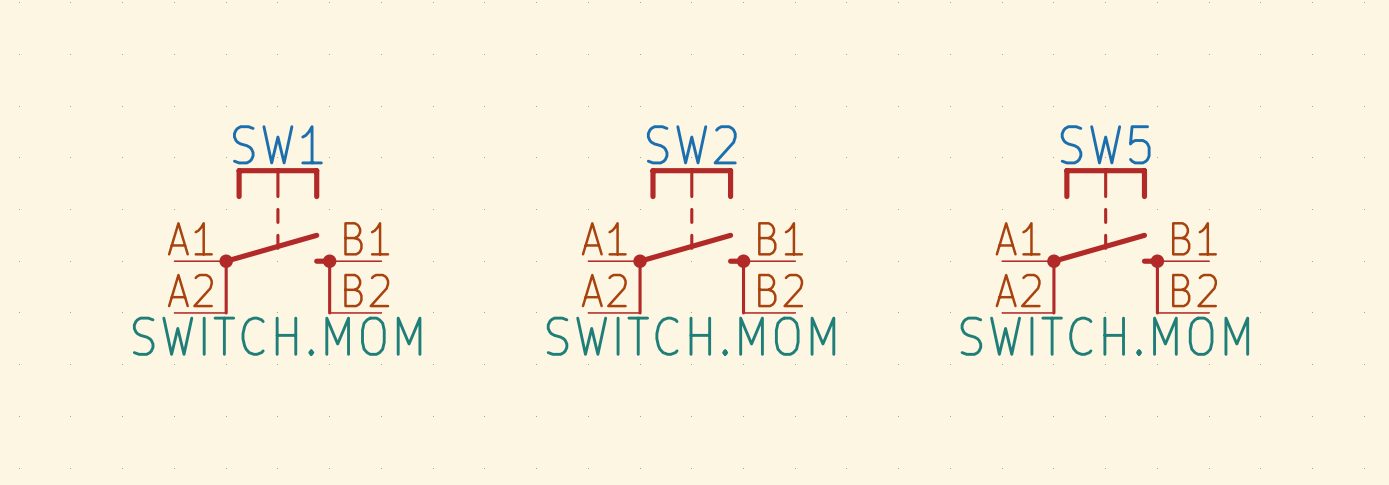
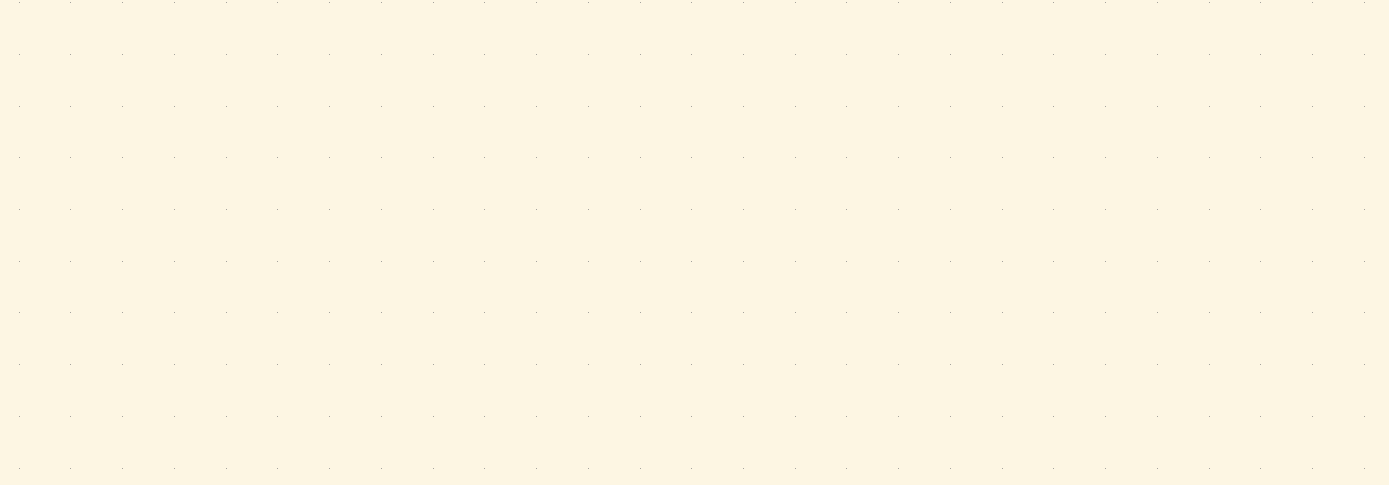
SW1: SWITCH.MOM (277, 241) -> none
SW2: SWITCH.MOM (691, 241) -> none
SW5: SWITCH.MOM (1105, 241) -> none

